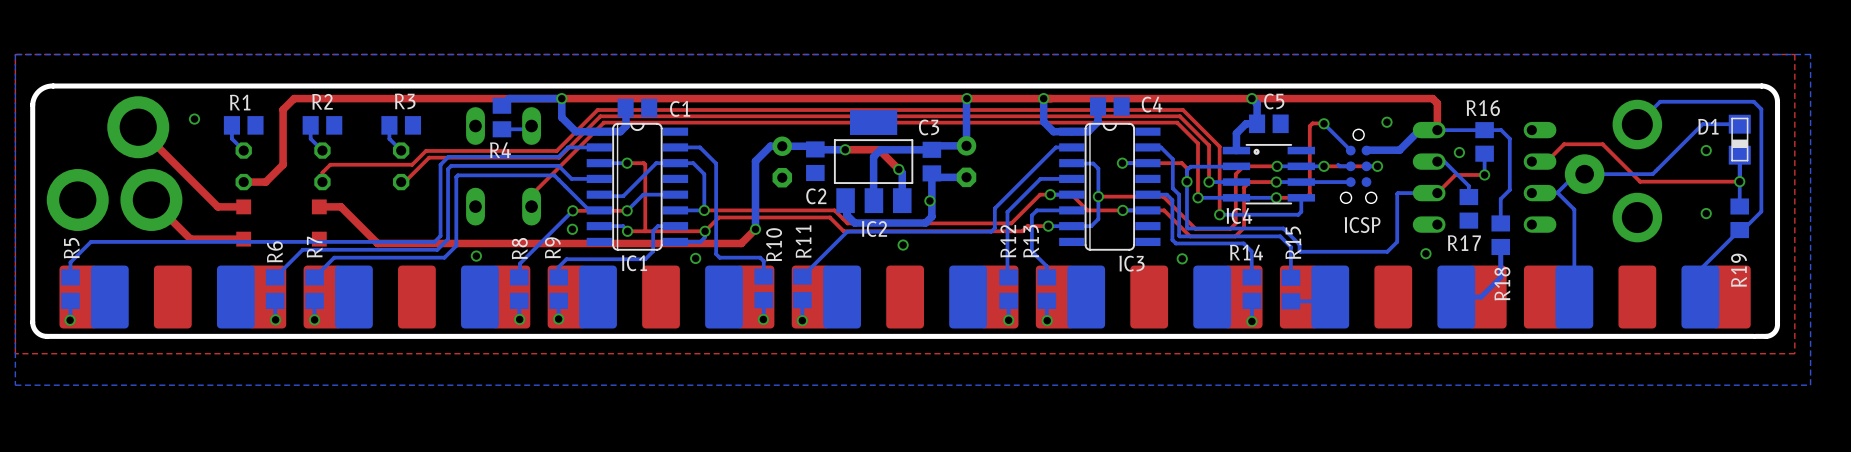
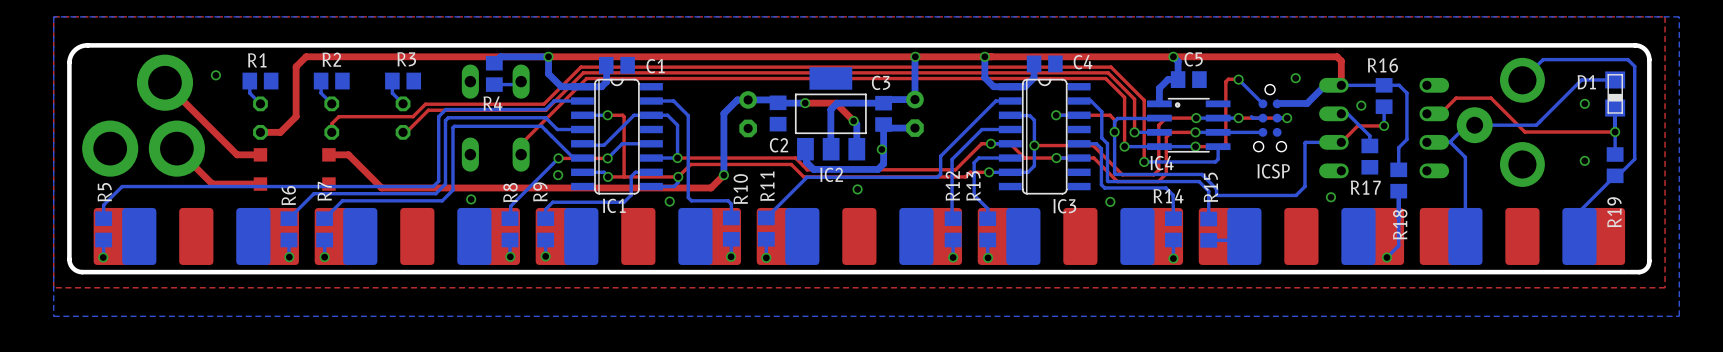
bottom track: (1500, 277) (1481, 297) (1456, 297) -> (1398, 218) (1398, 245) (1386, 257)
via: none -> (1386, 257)

